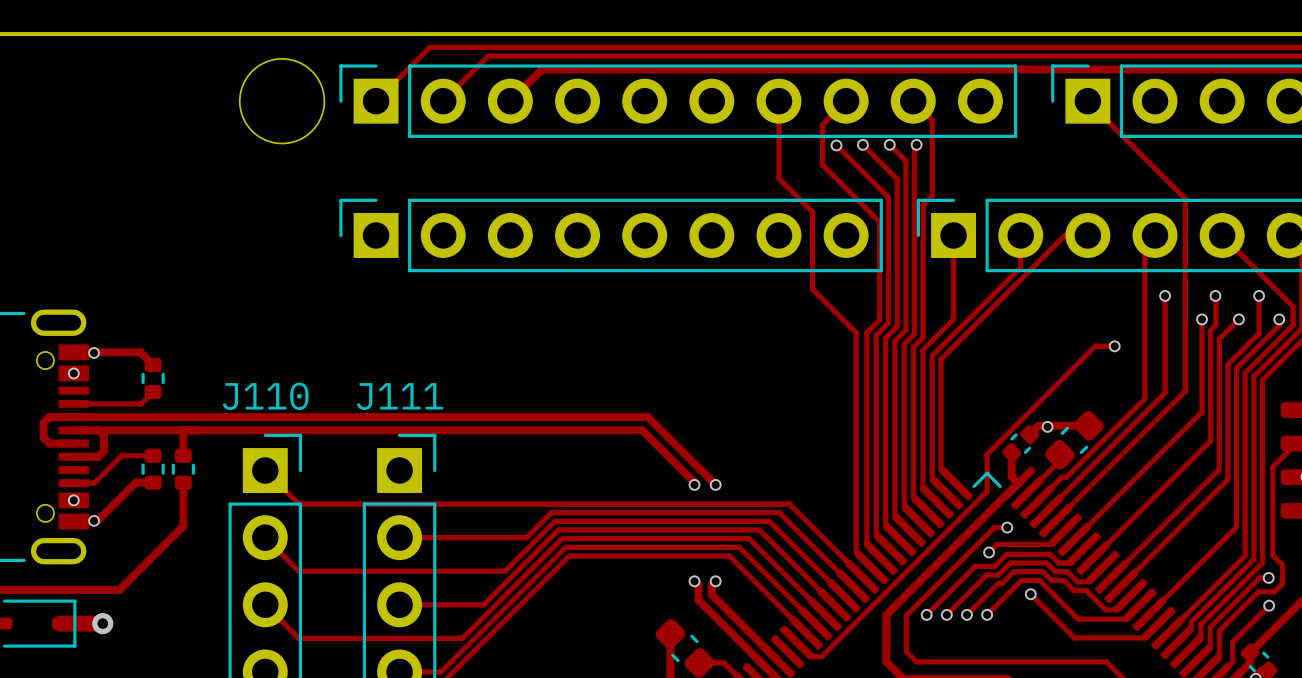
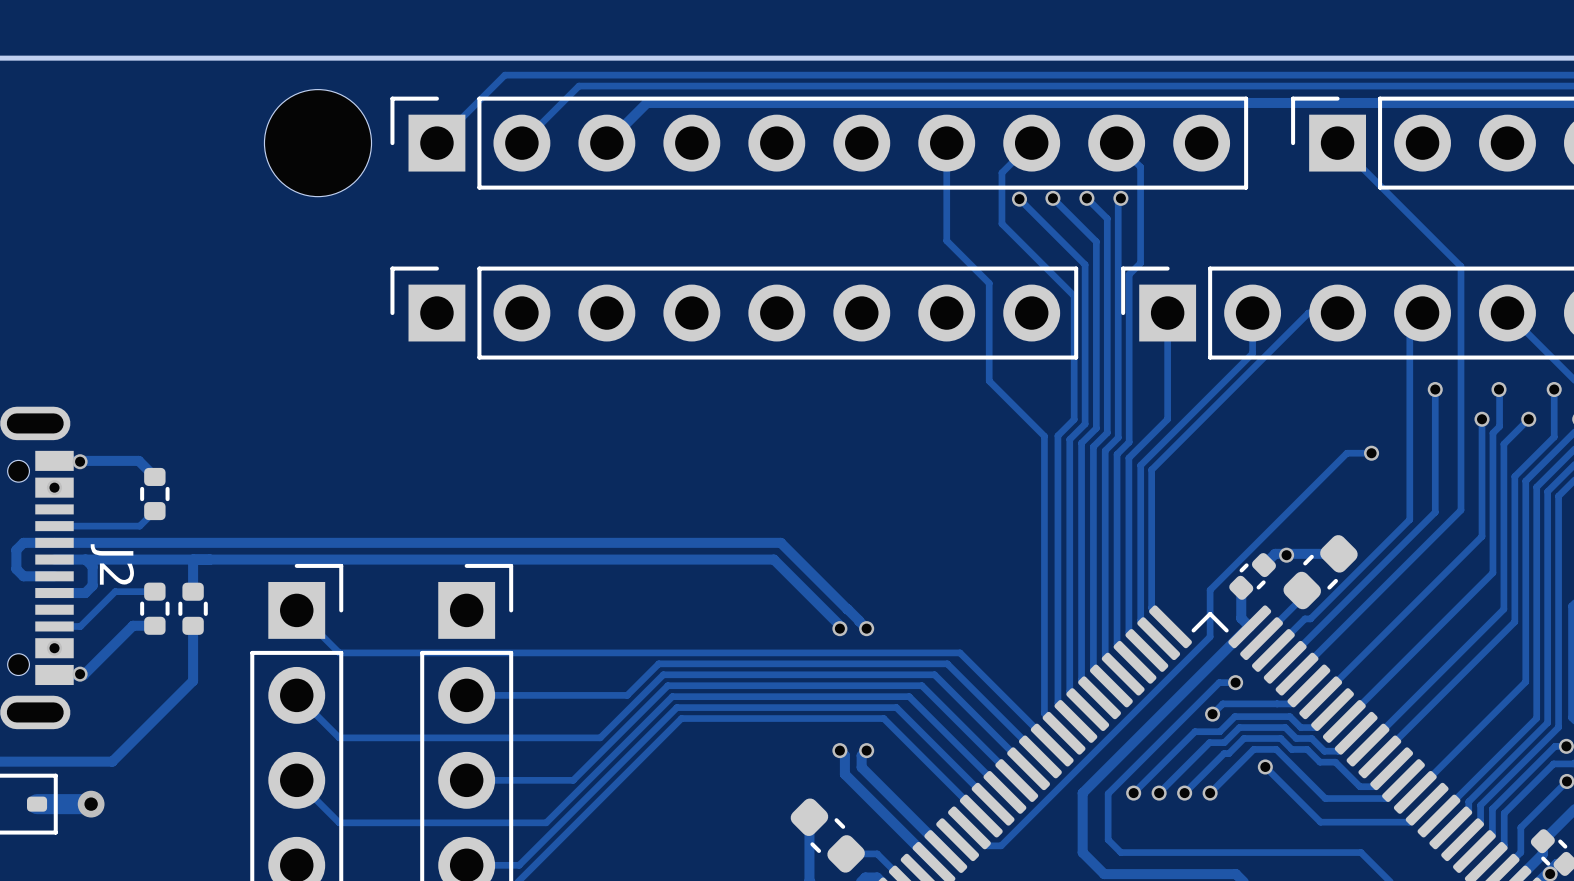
J110 name: J110 (265, 396) -> none
J111 name: J111 (400, 396) -> none
J2 name: none -> J2 (112, 564)

